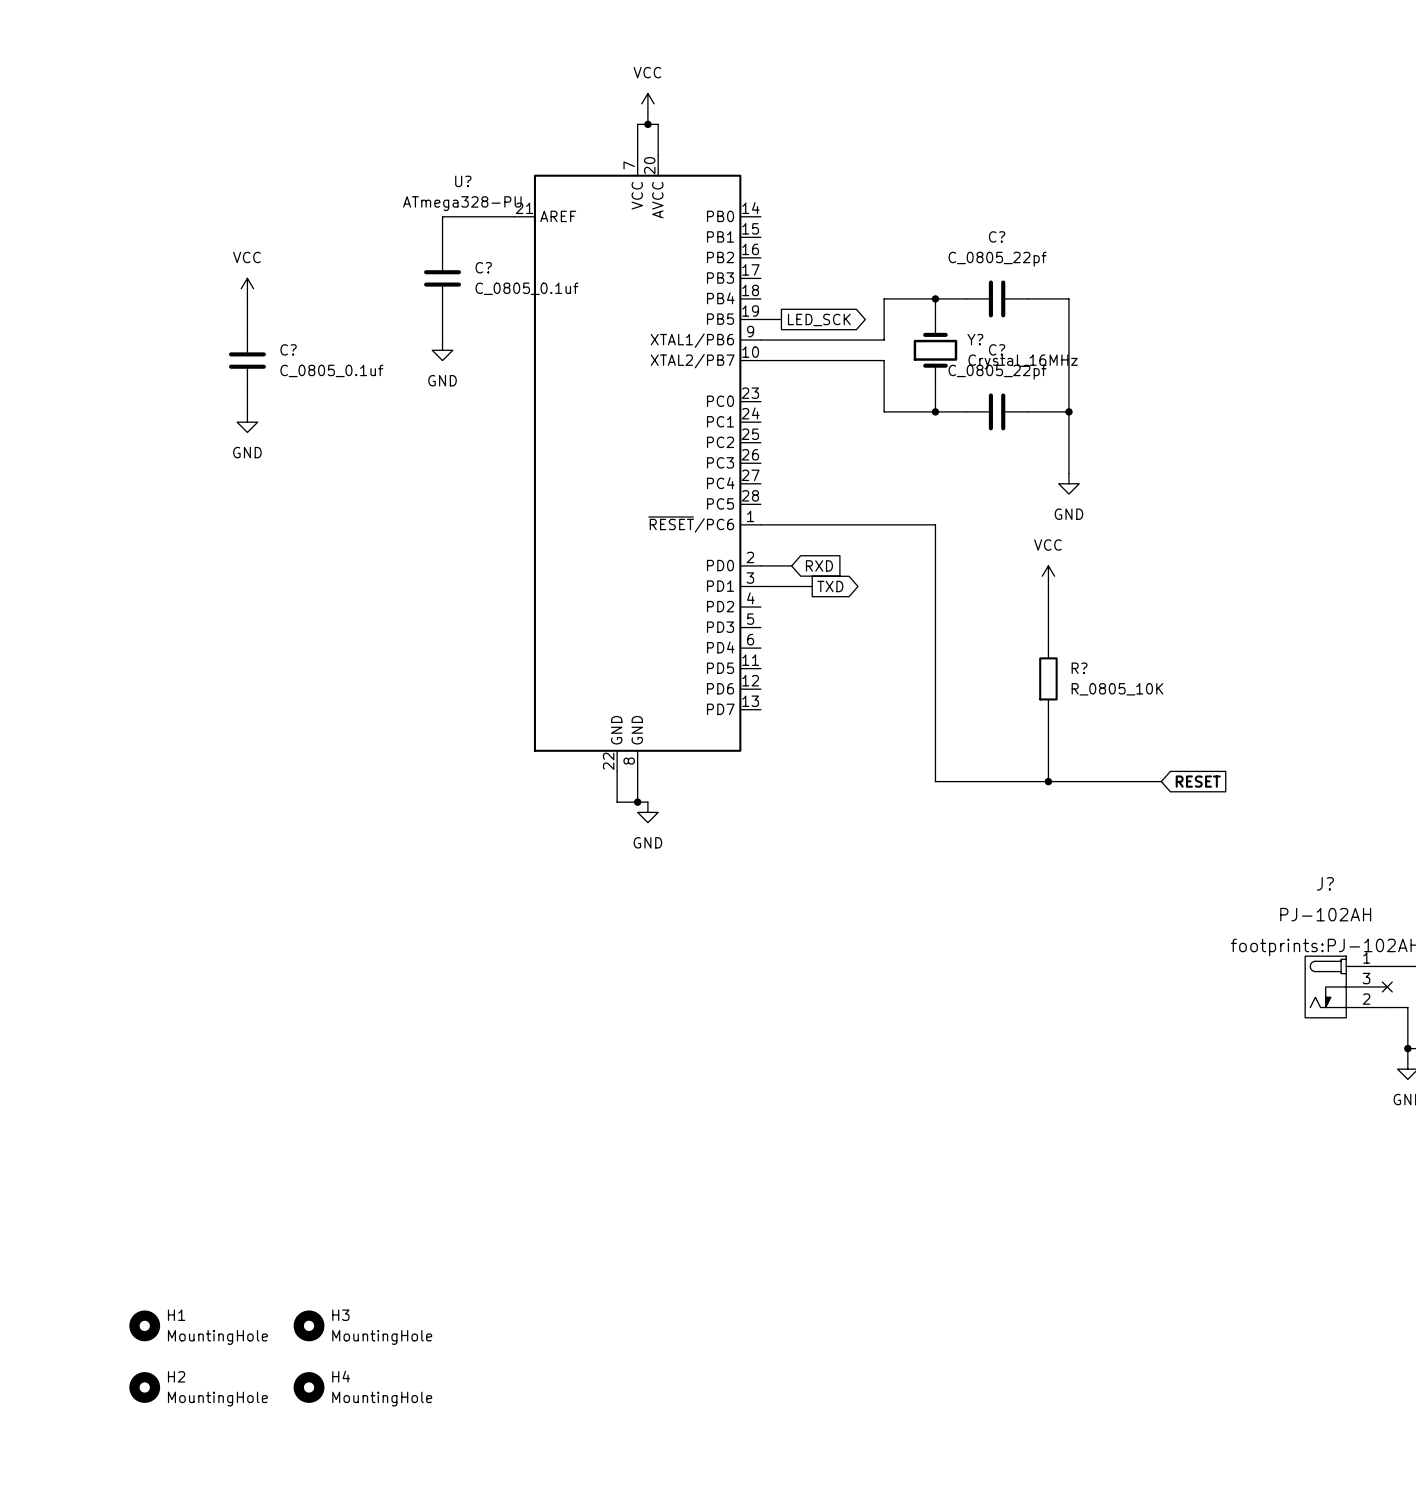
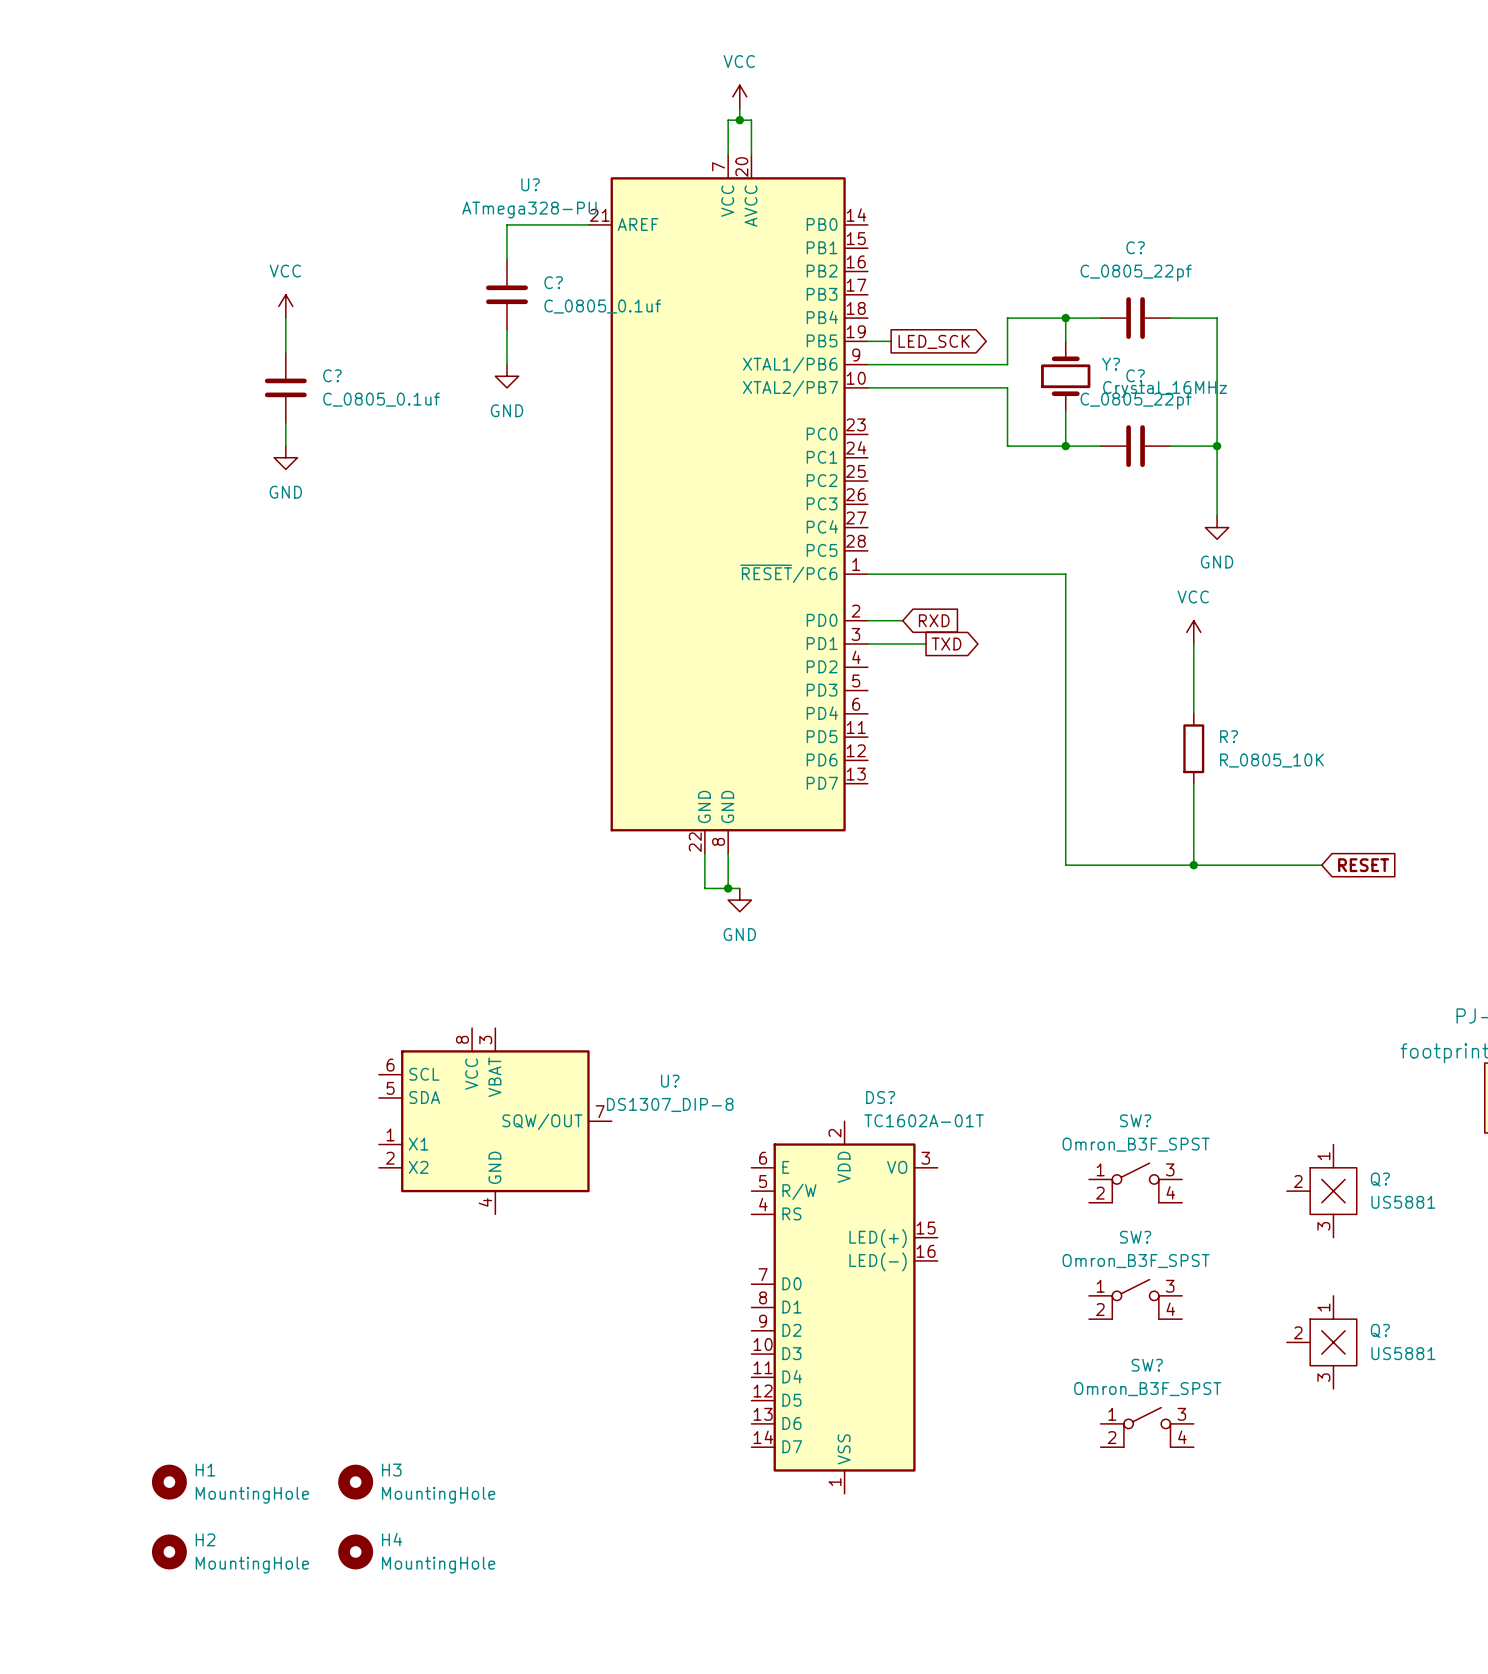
U?: none -> DS1307_DIP-8 (495, 1121)
SW?: none -> Omron_B3F_SPST (1135, 1182)
Q?: none -> US5881 (1321, 1191)
SW?: none -> Omron_B3F_SPST (1135, 1299)
DS?: none -> TC1602A-01T (844, 1307)
Q?: none -> US5881 (1321, 1342)
SW?: none -> Omron_B3F_SPST (1147, 1427)

